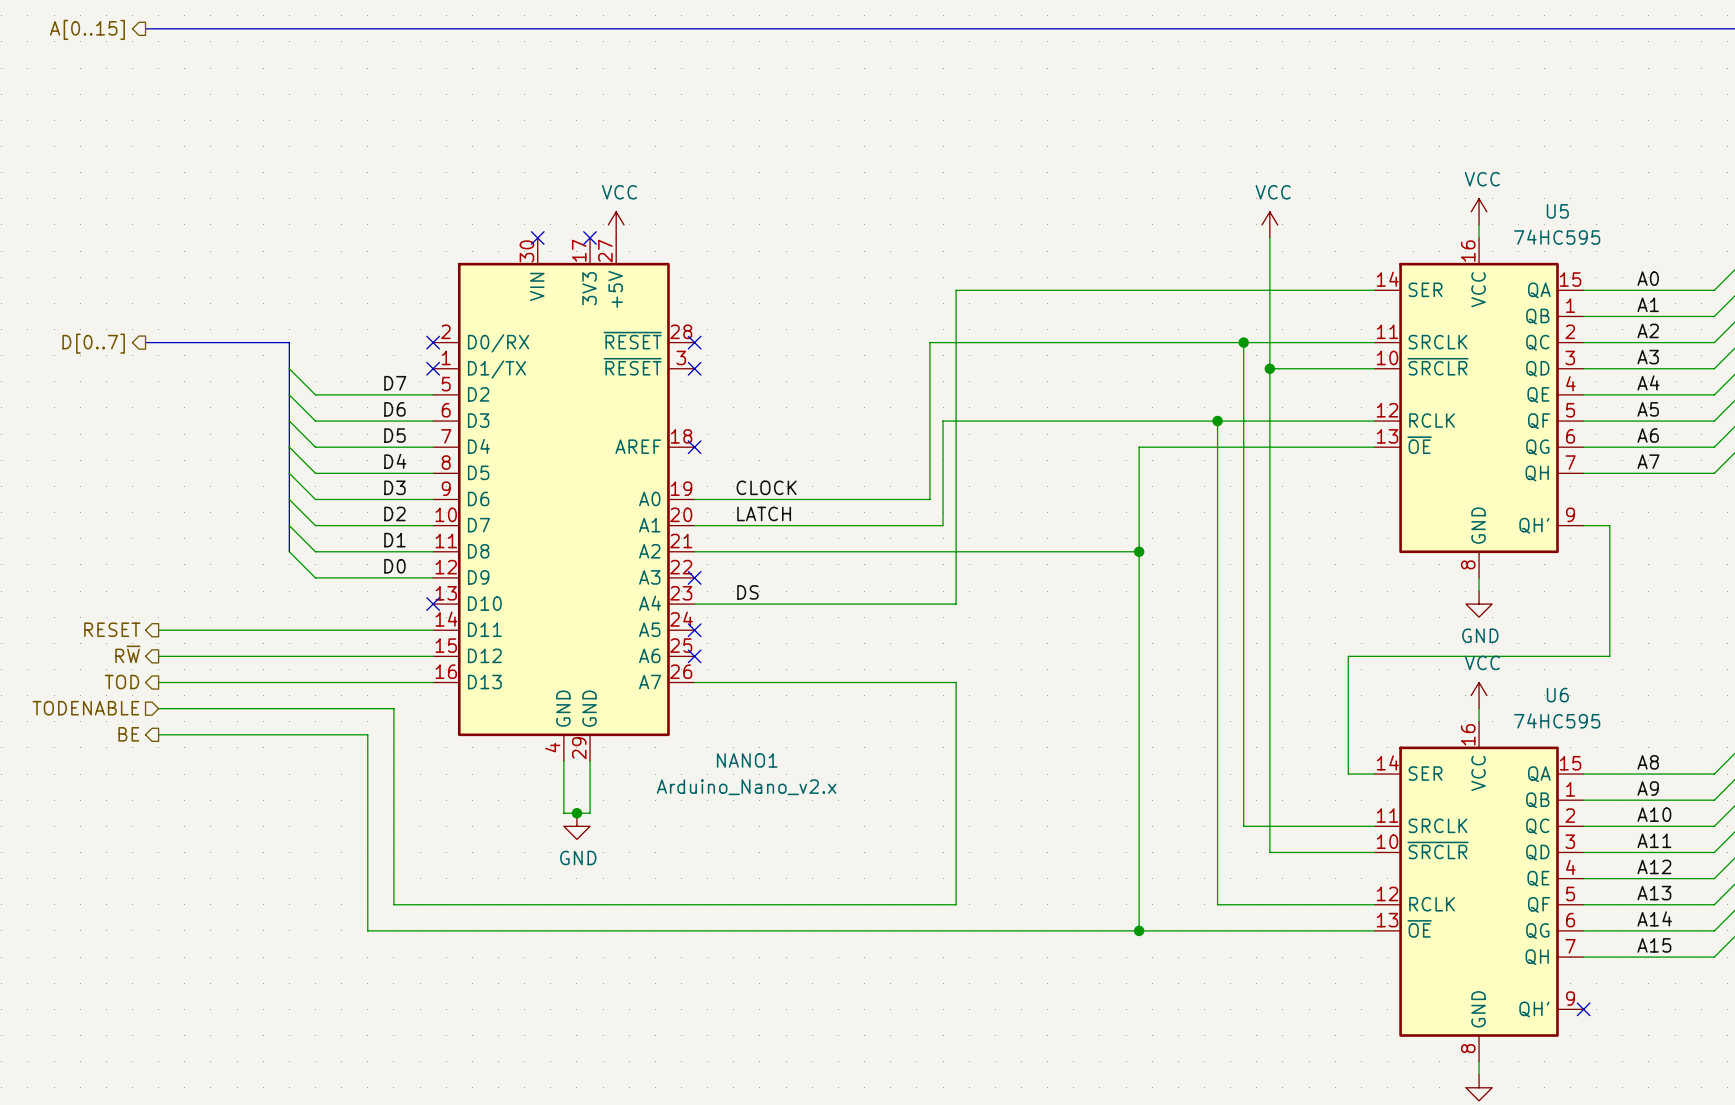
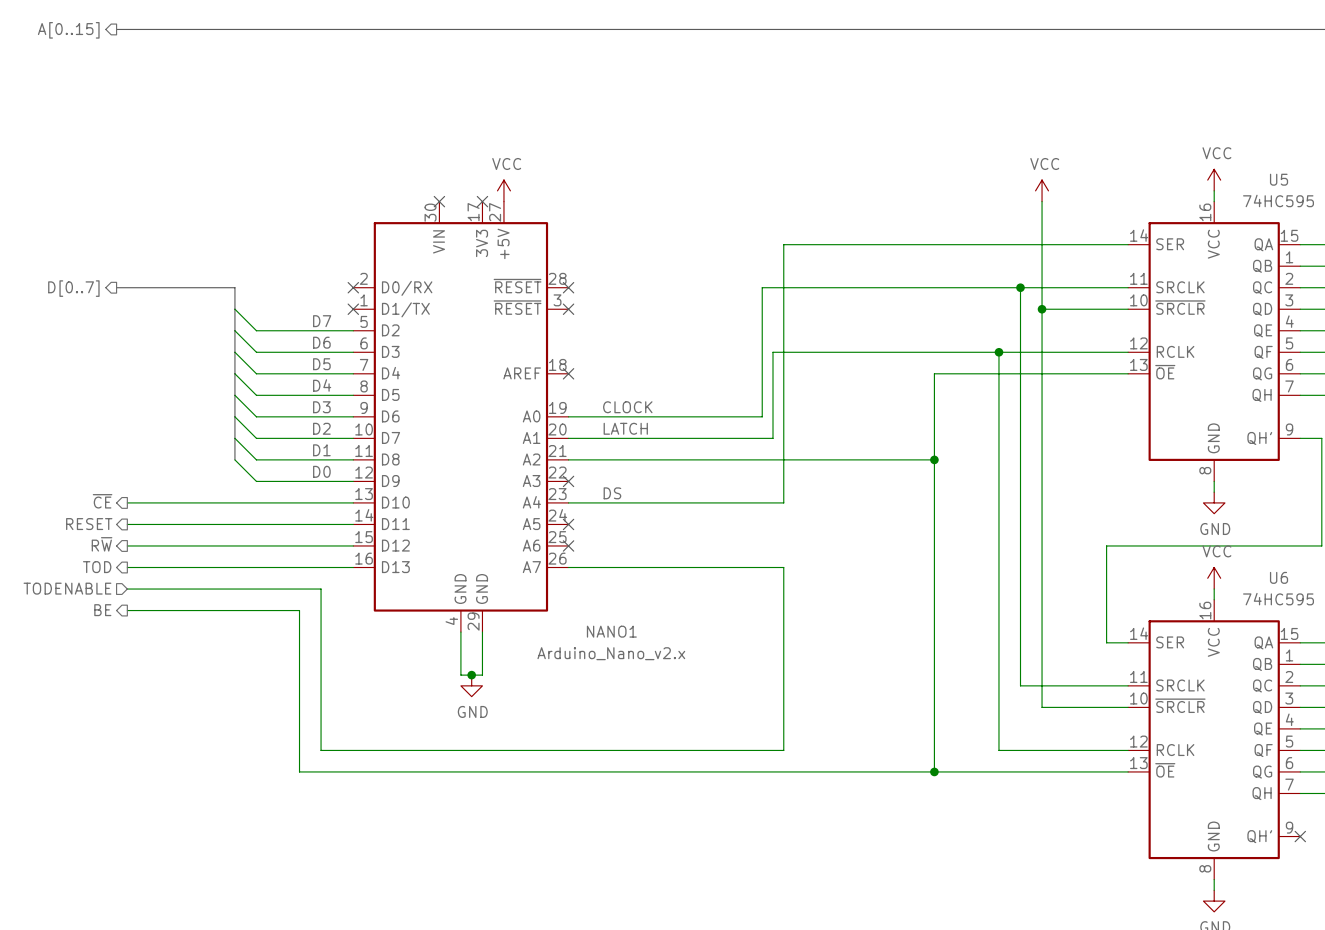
hierarchical label: none -> ~{CE} (102, 501)
wire: none -> (127, 502) (353, 502)
no-connect mark: (433, 604) -> none

